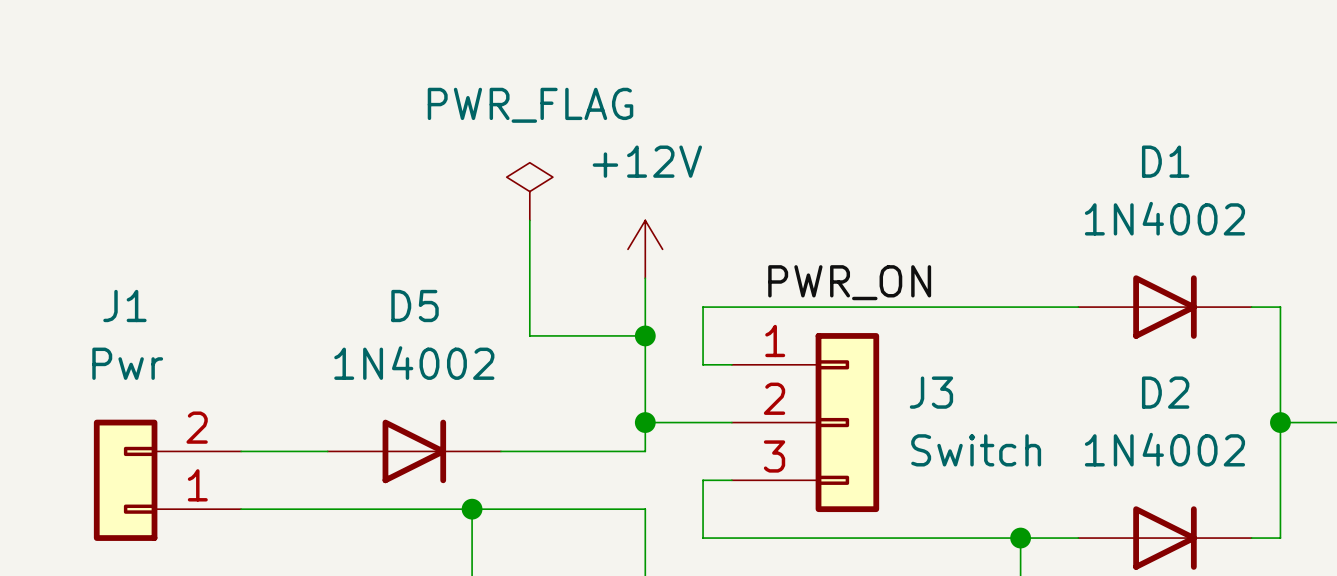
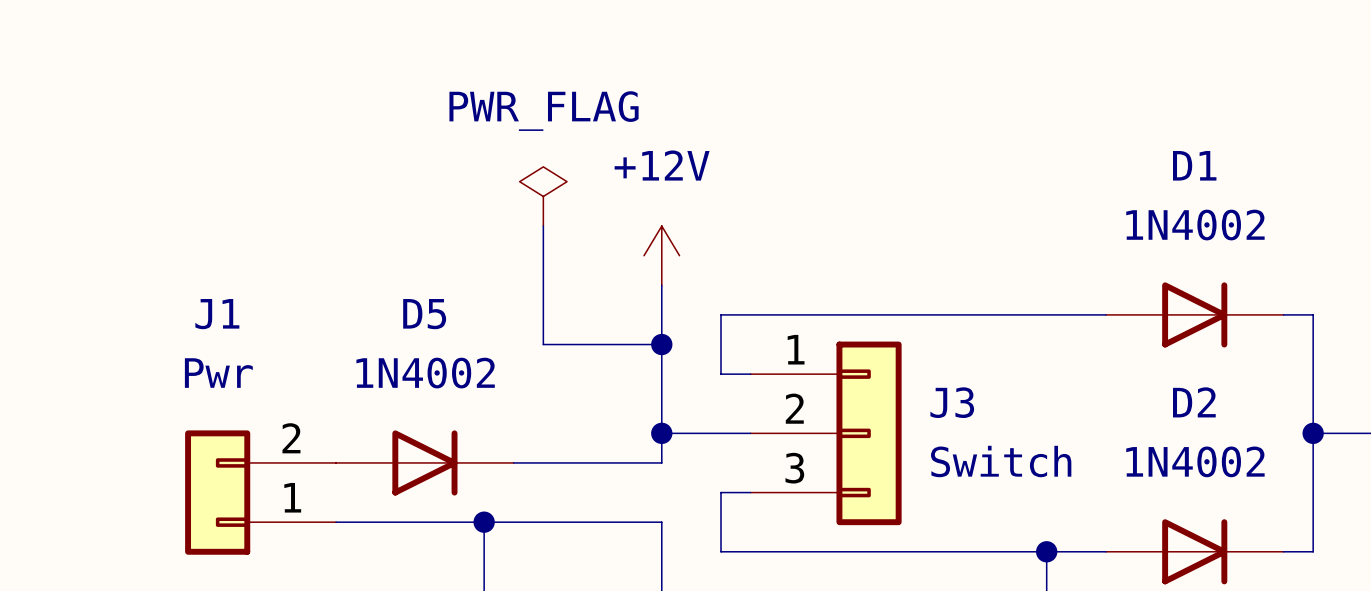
label: PWR_ON (849, 282) -> none
J1 position: (167, 480) -> (260, 492)

